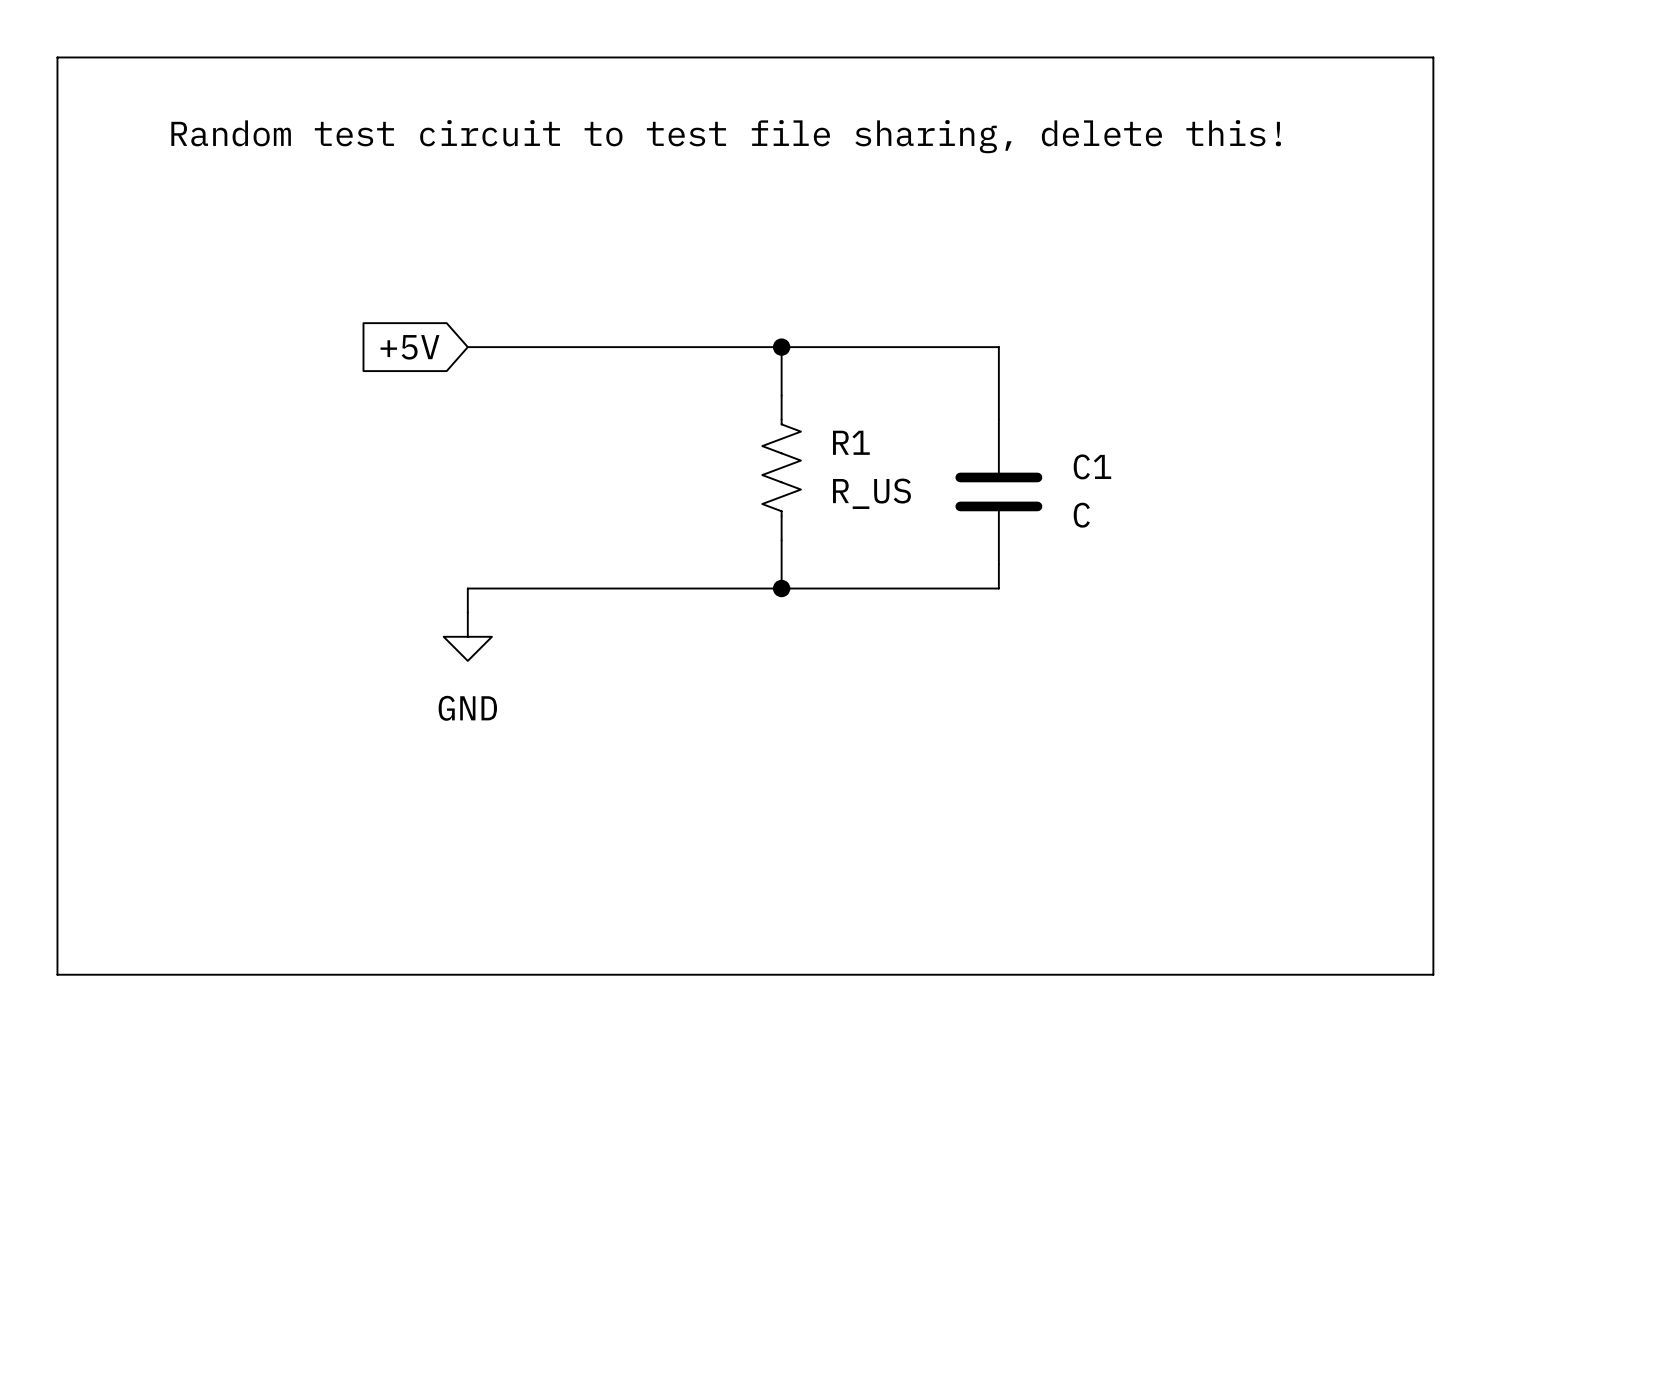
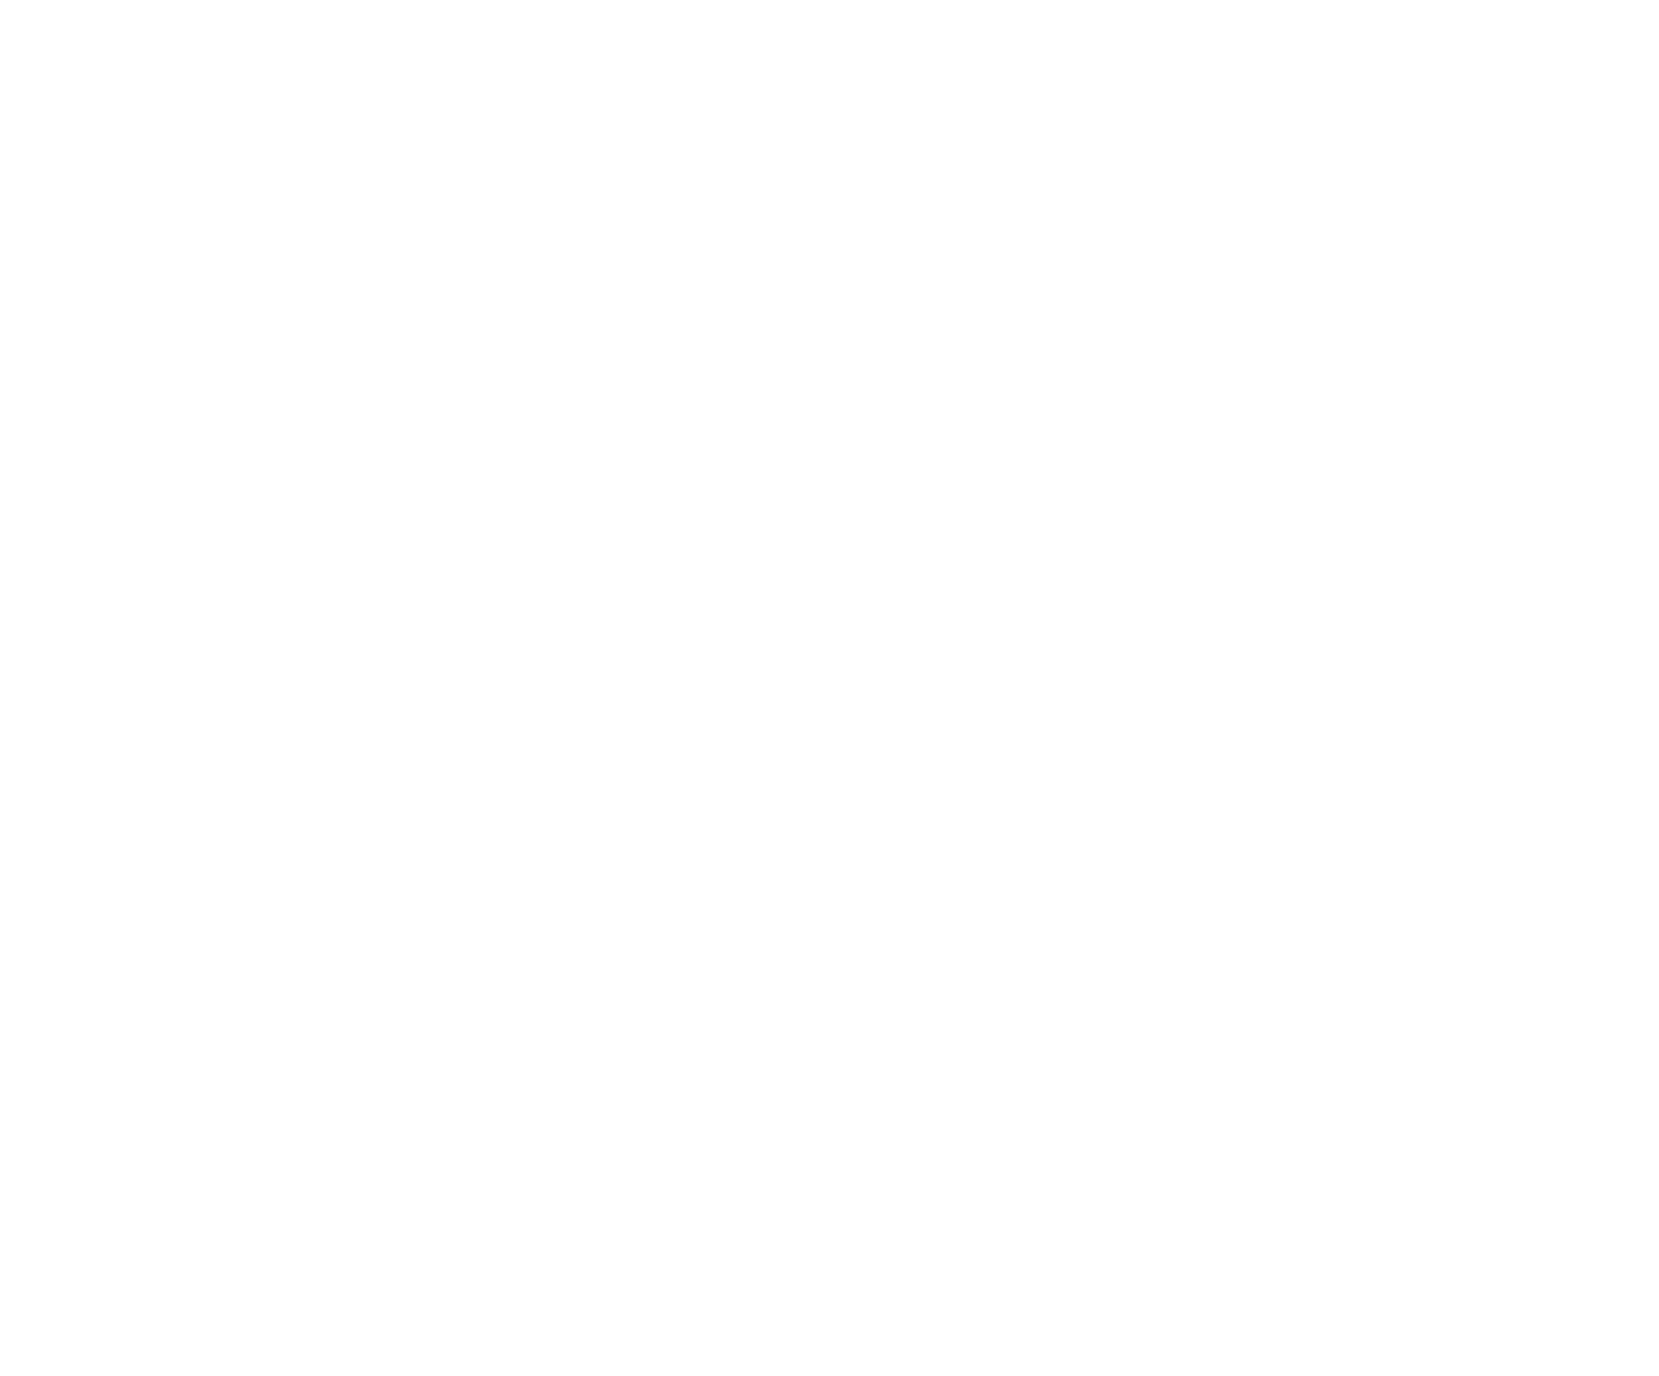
line: (57, 57) (1433, 57) (1433, 974) (57, 974) (57, 57) -> none
text: Random test circuit to test file sharing, delete this! (726, 136) -> none
global label: +5V (409, 347) -> none
wire: (467, 347) (998, 347) (998, 419) -> none
wire: (781, 347) (781, 395) -> none
junction: (781, 347) -> none
R1: R_US (781, 467) -> none
C1: C (998, 491) -> none
wire: (781, 540) (781, 588) -> none
wire: (998, 564) (998, 588) (467, 588) (467, 612) -> none
junction: (781, 588) -> none
power symbol: GND (467, 636) -> none

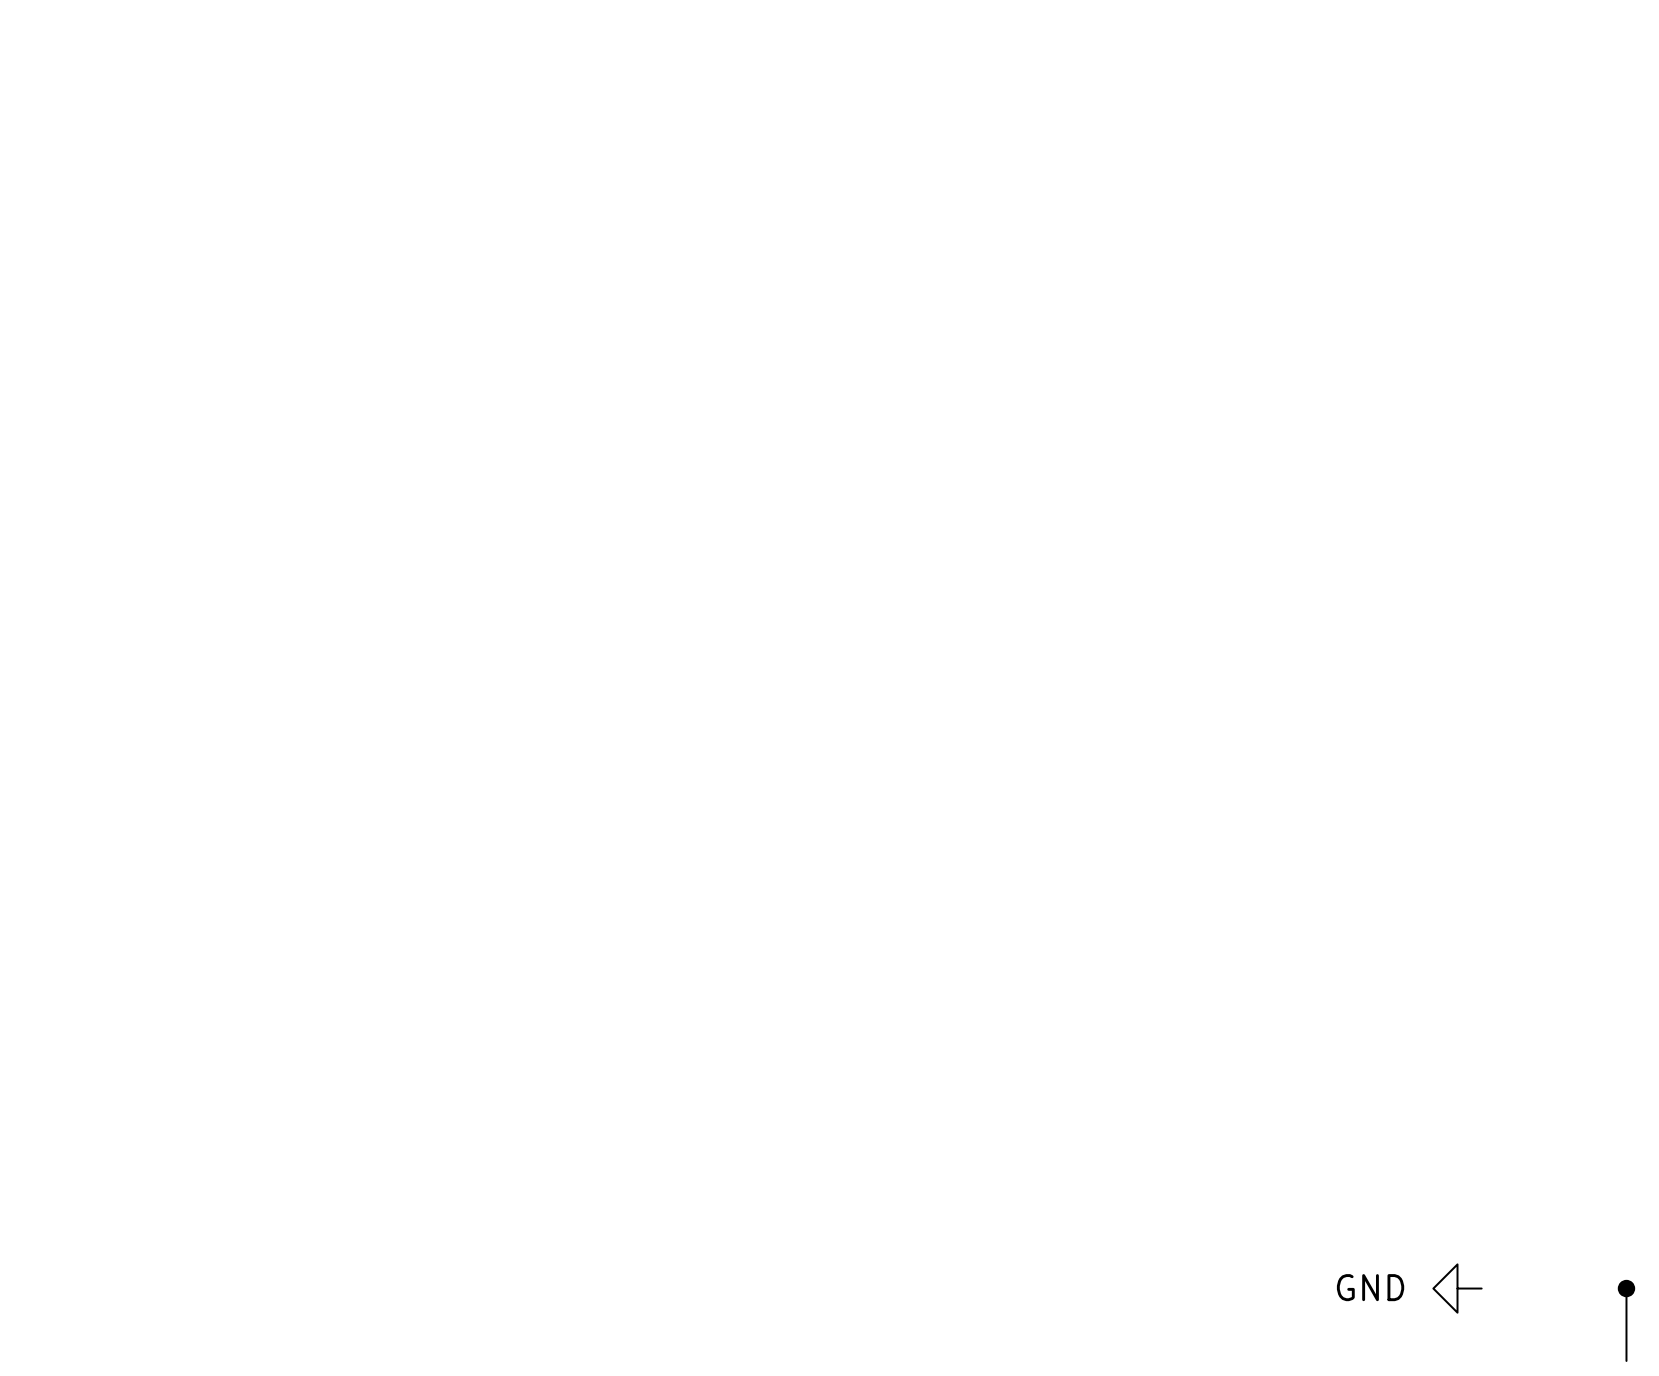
power symbol: none -> GND (1457, 1288)
wire: none -> (1626, 1288) (1626, 1360)
junction: none -> (1626, 1288)

